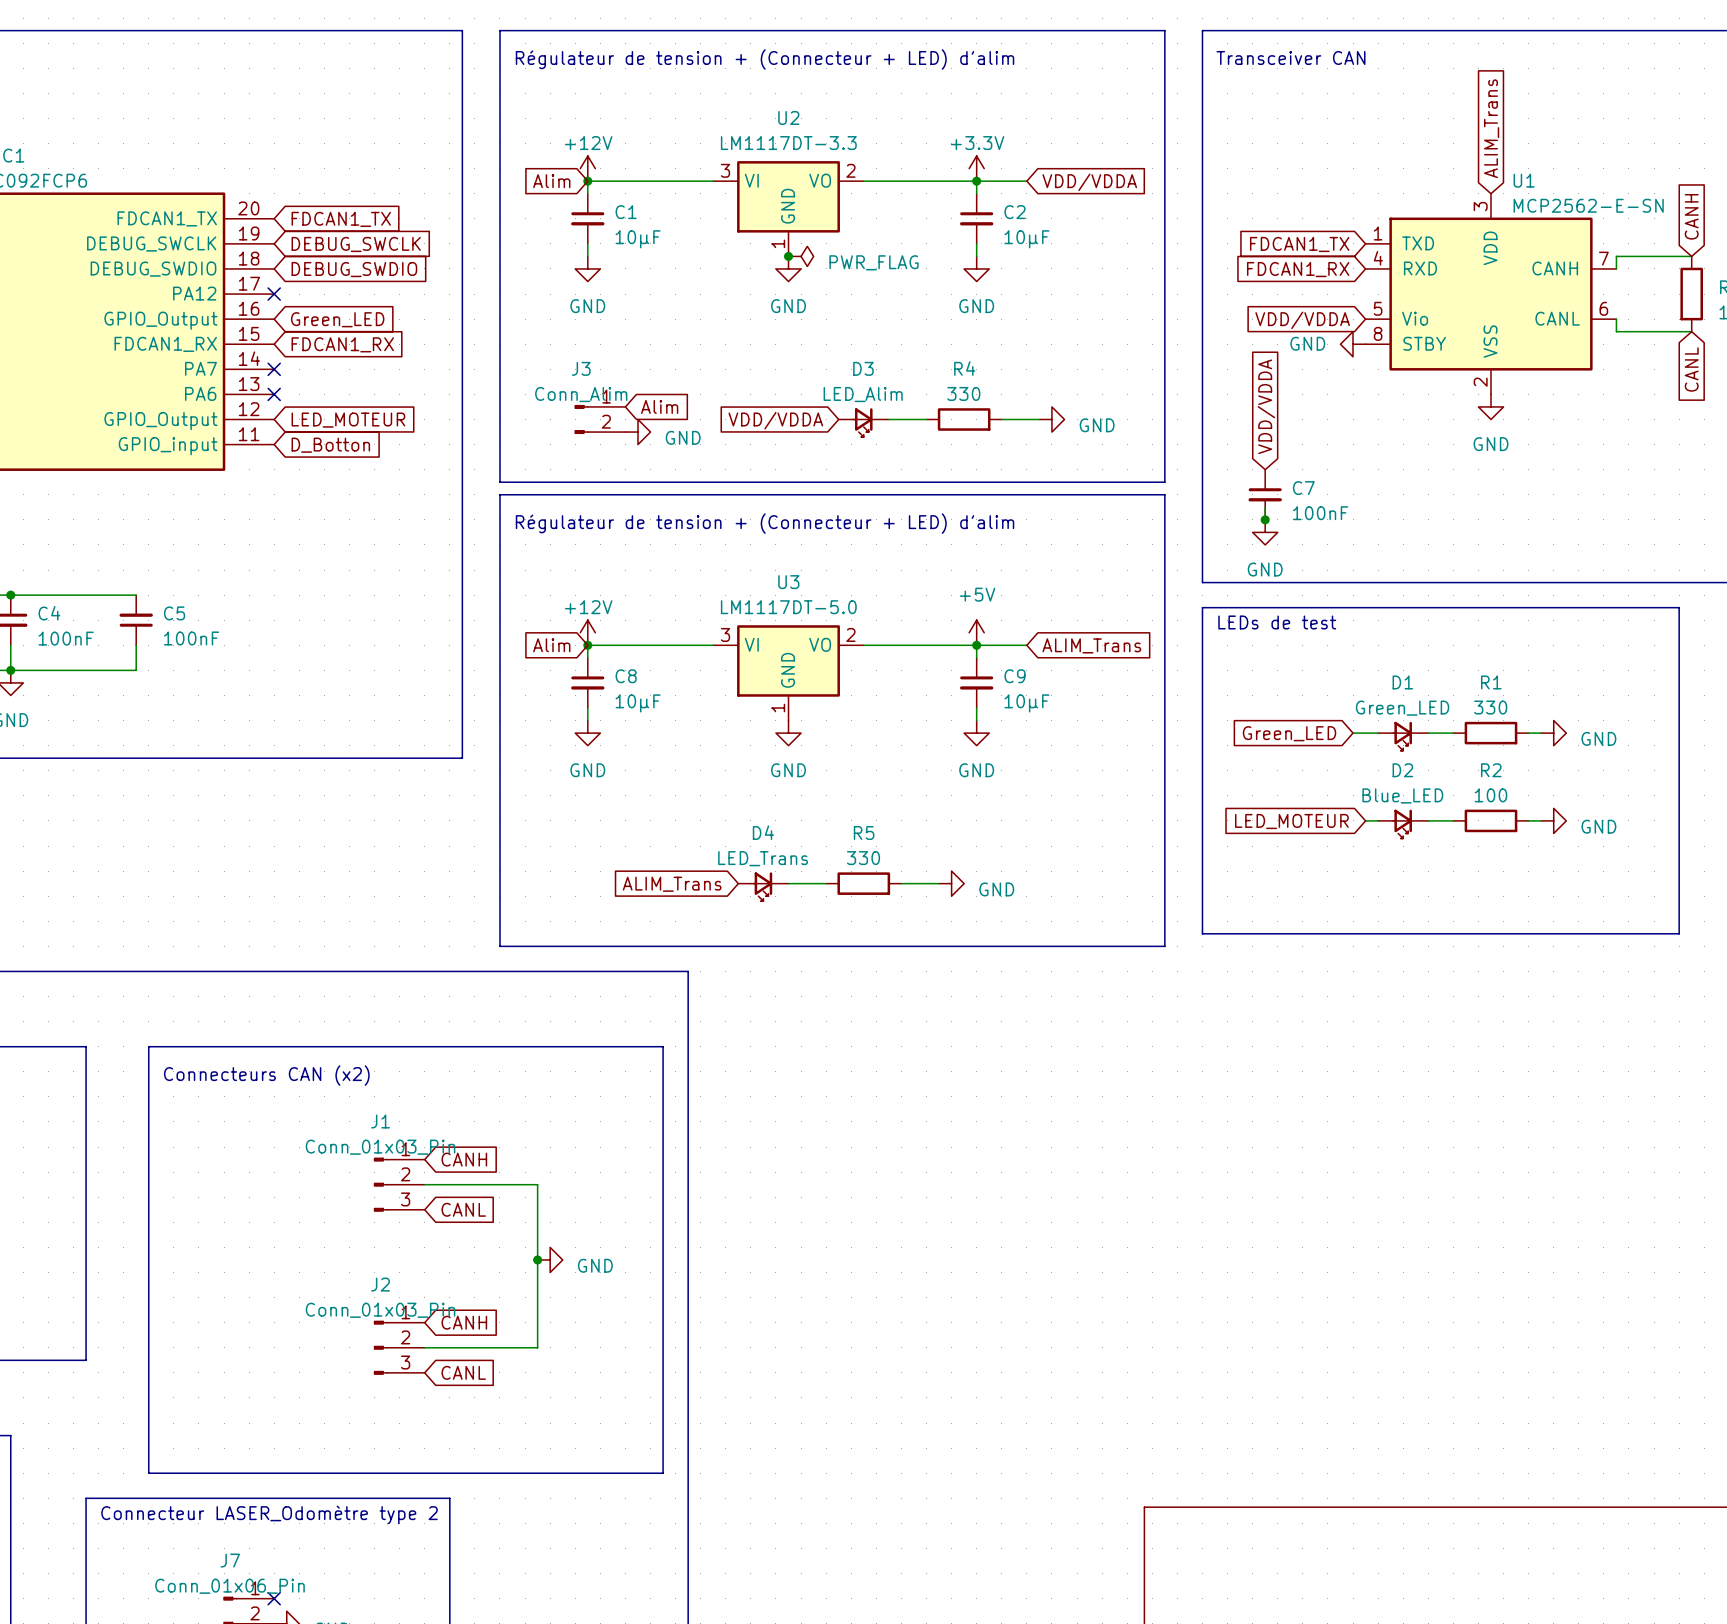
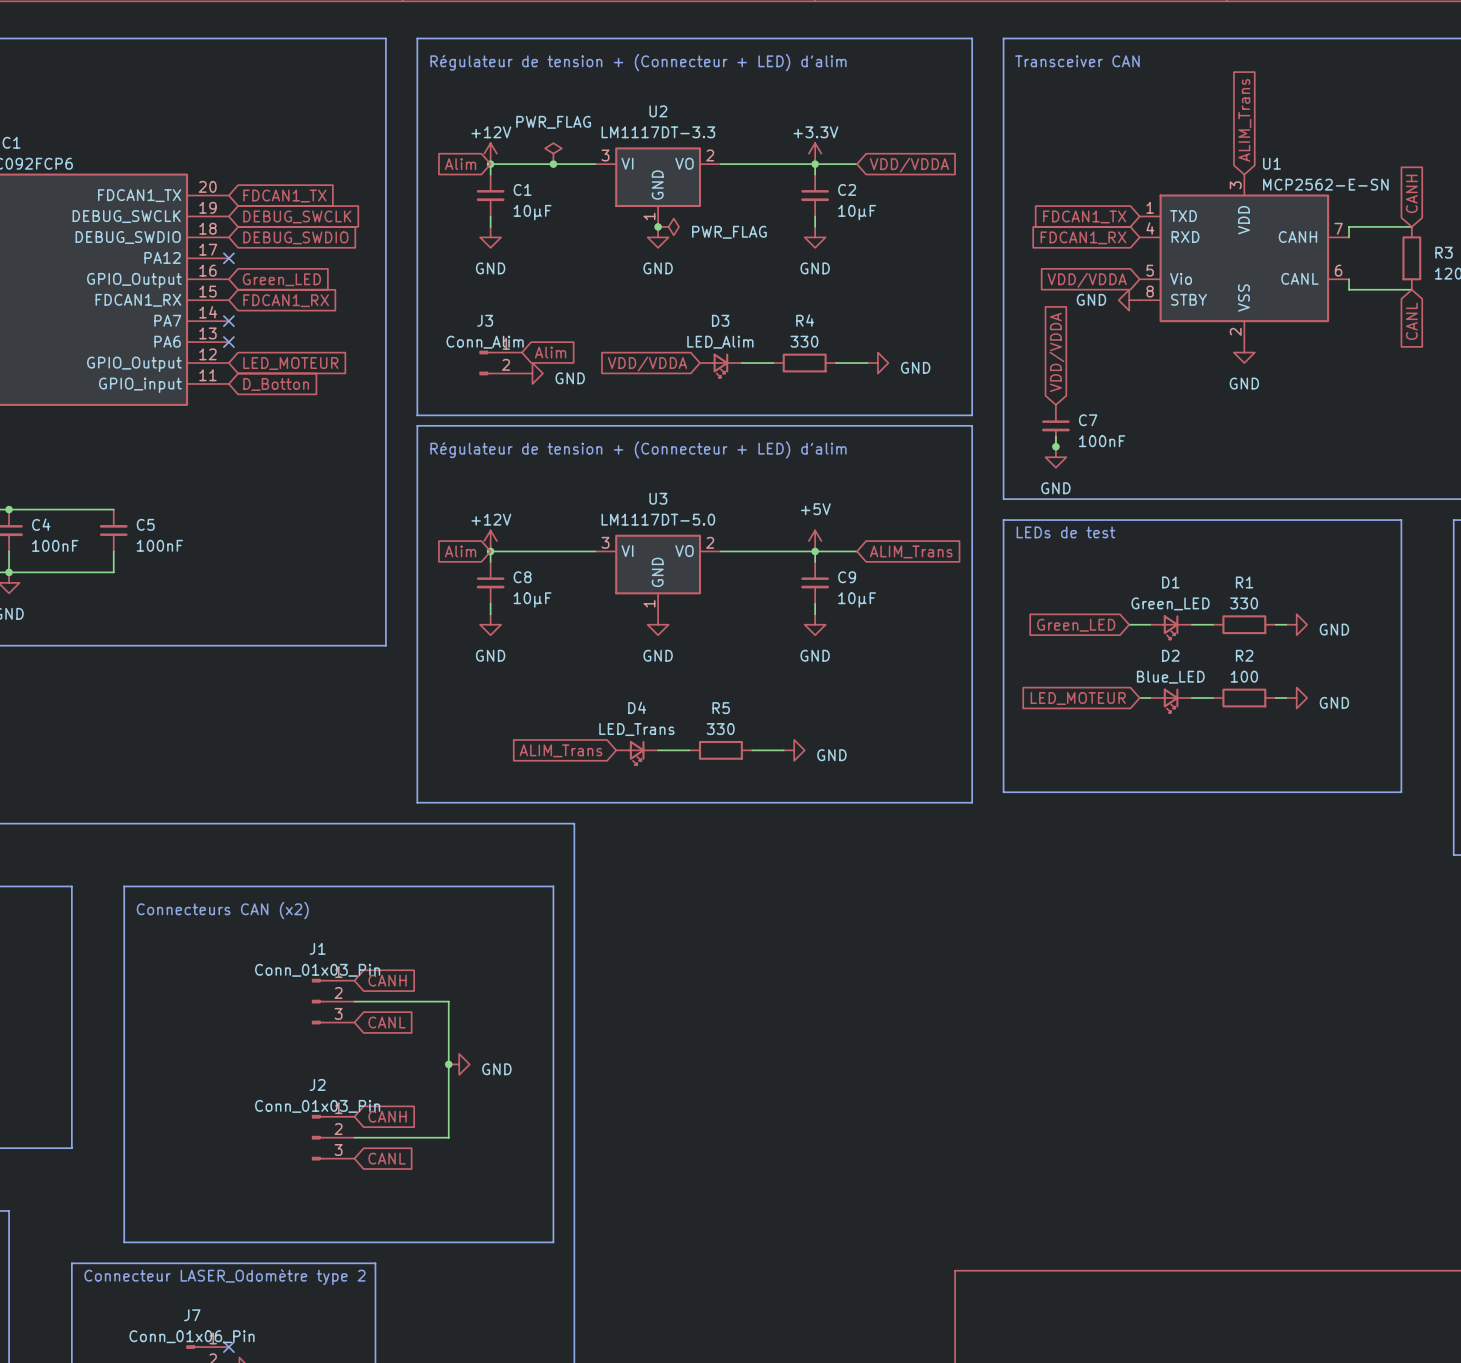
power symbol: none -> PWR_FLAG (553, 153)
junction: none -> (553, 164)

